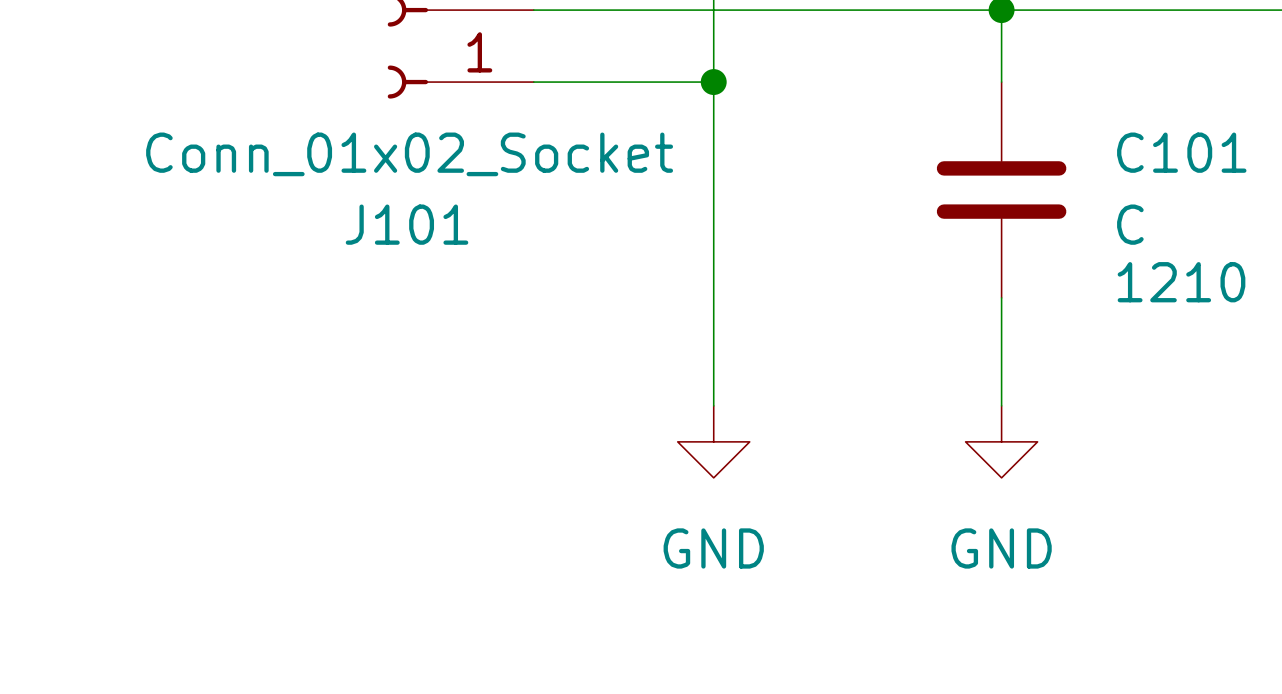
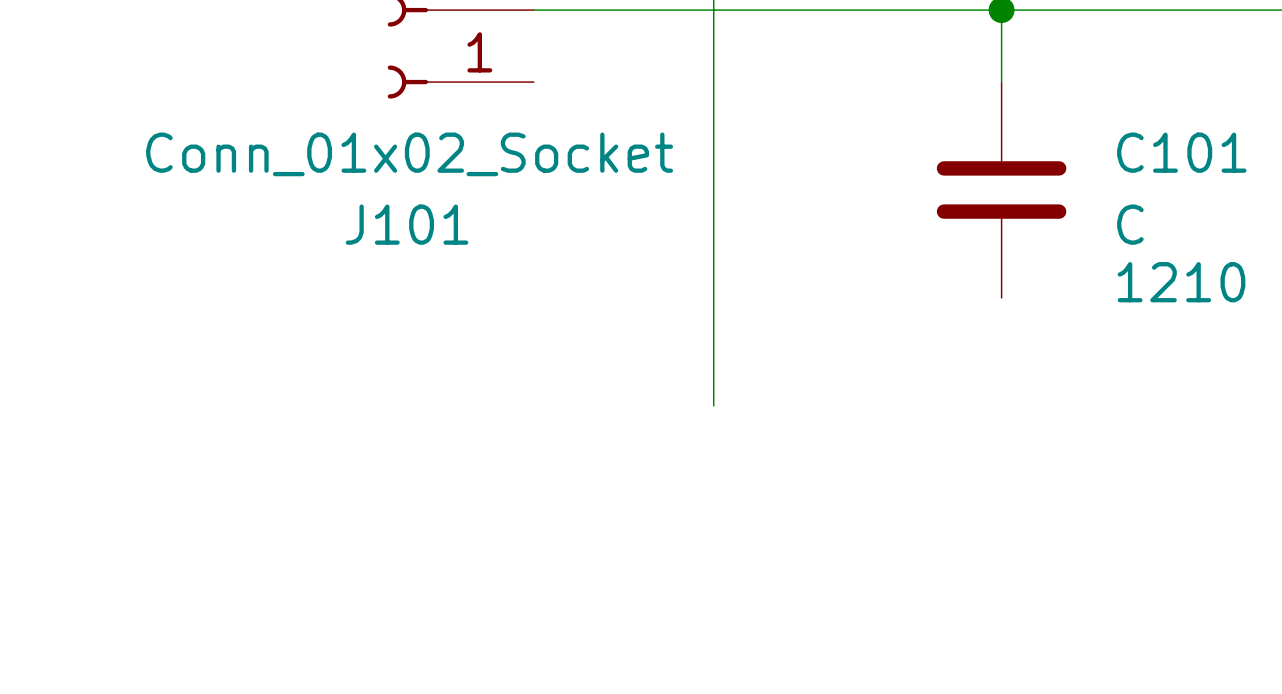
wire: (533, 82) (713, 82) -> none
junction: (713, 82) -> none
wire: (1001, 297) (1001, 405) -> none
power symbol: GND (713, 441) -> none
power symbol: GND (1001, 441) -> none

